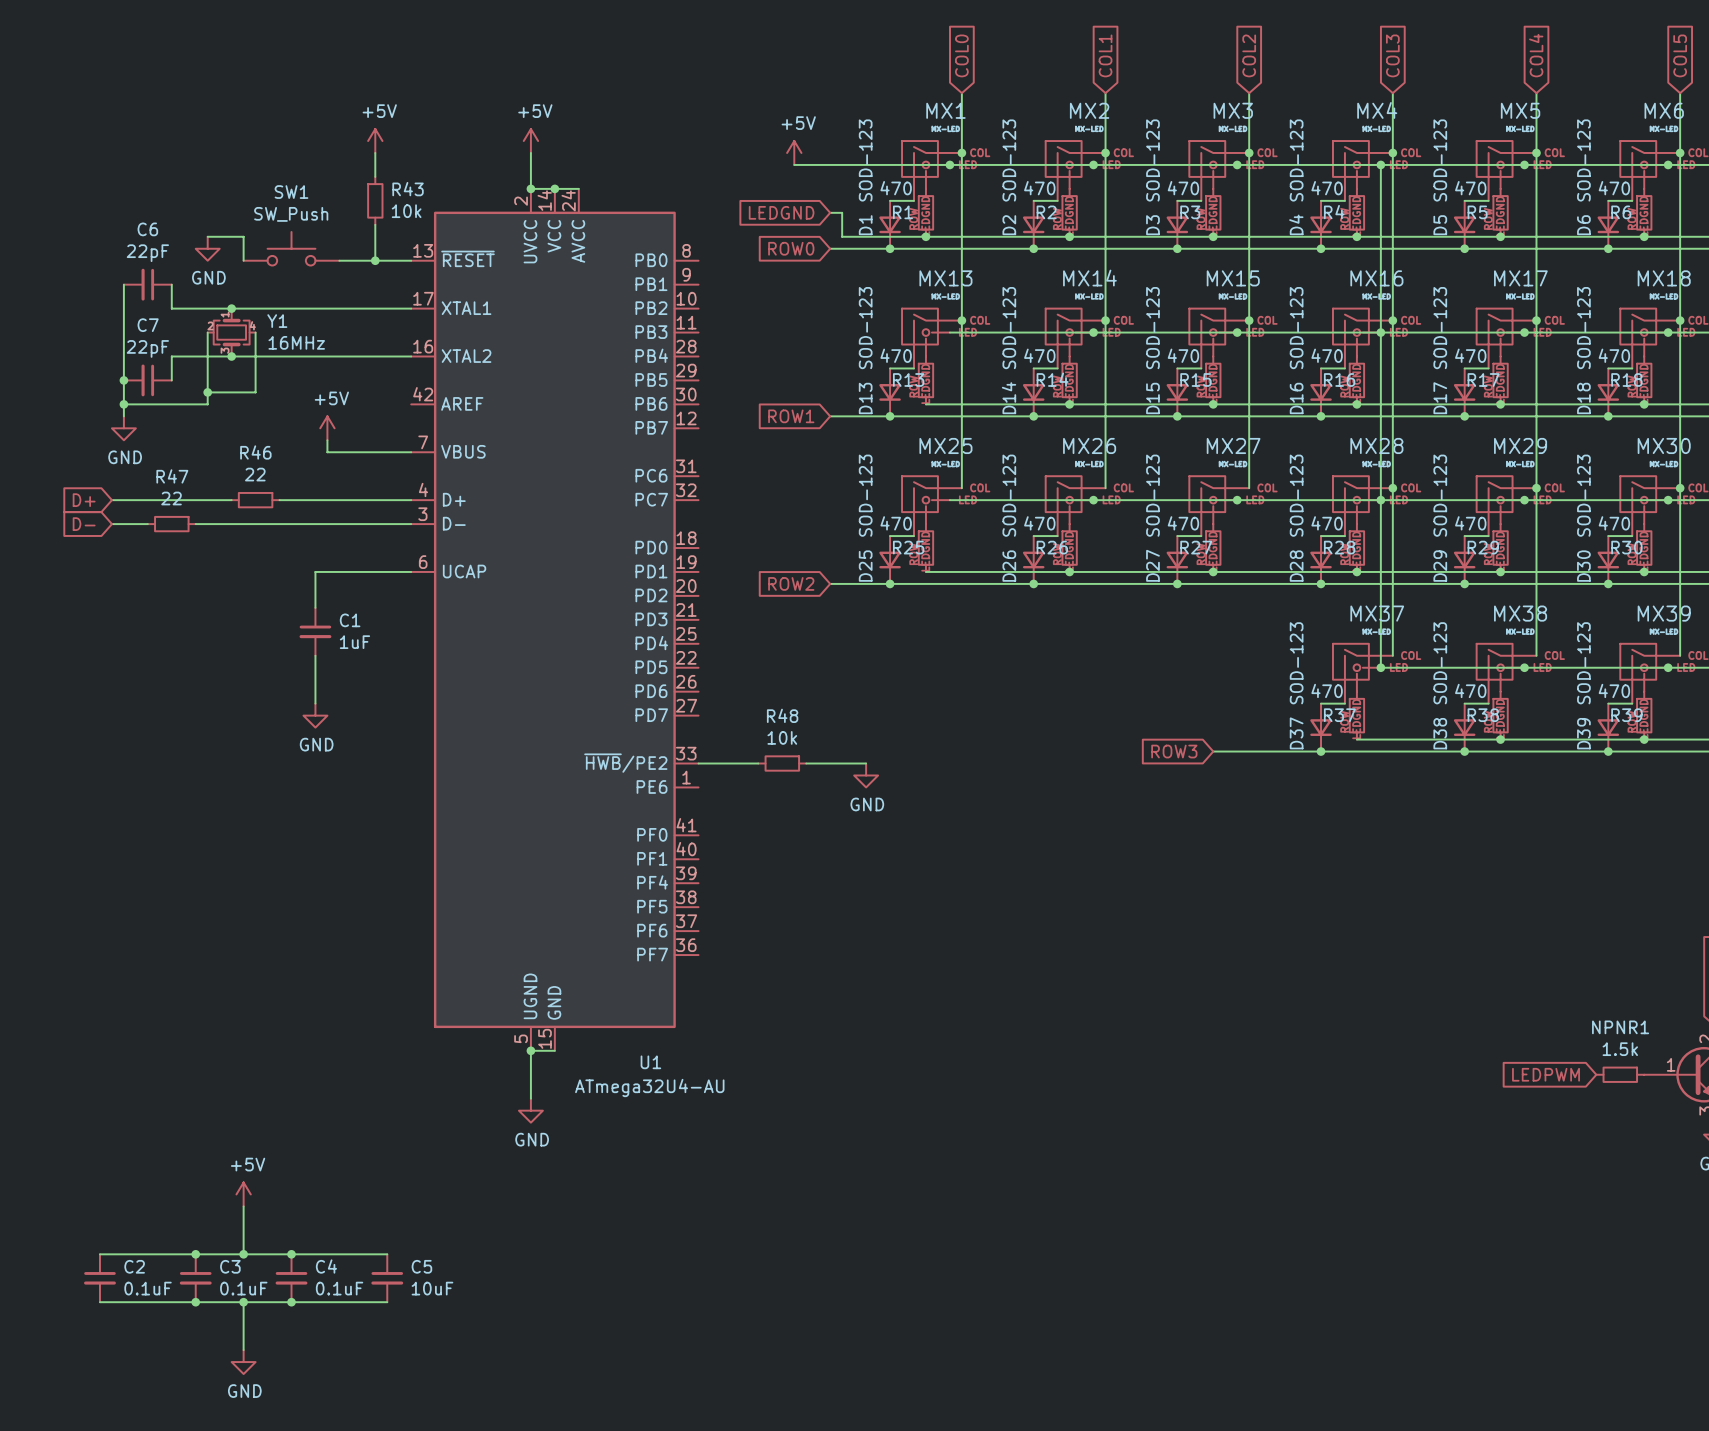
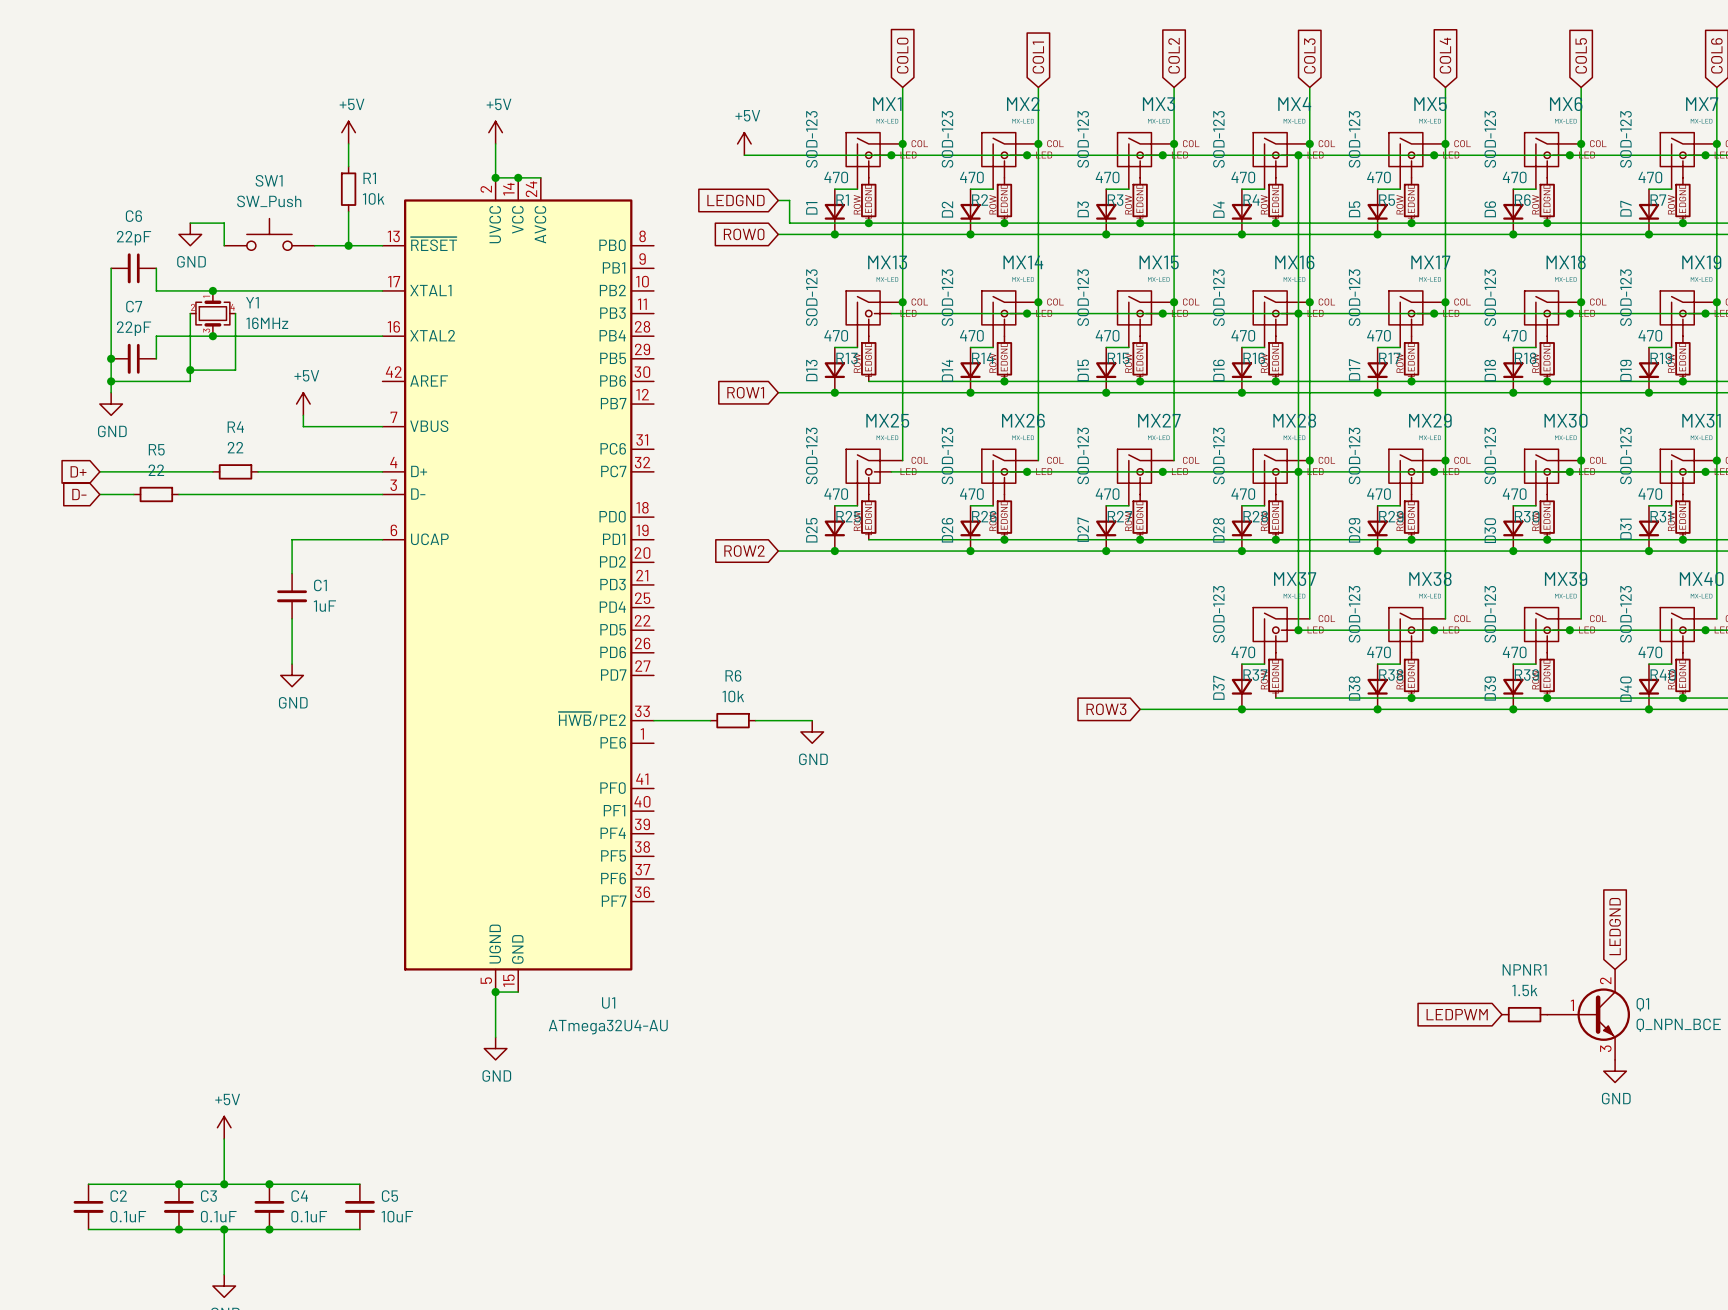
R43 name: R43 (408, 189) -> R1 (369, 178)
R46 name: R46 (255, 452) -> R4 (235, 427)
R47 name: R47 (172, 476) -> R5 (156, 449)
R48 name: R48 (782, 715) -> R6 (733, 675)

